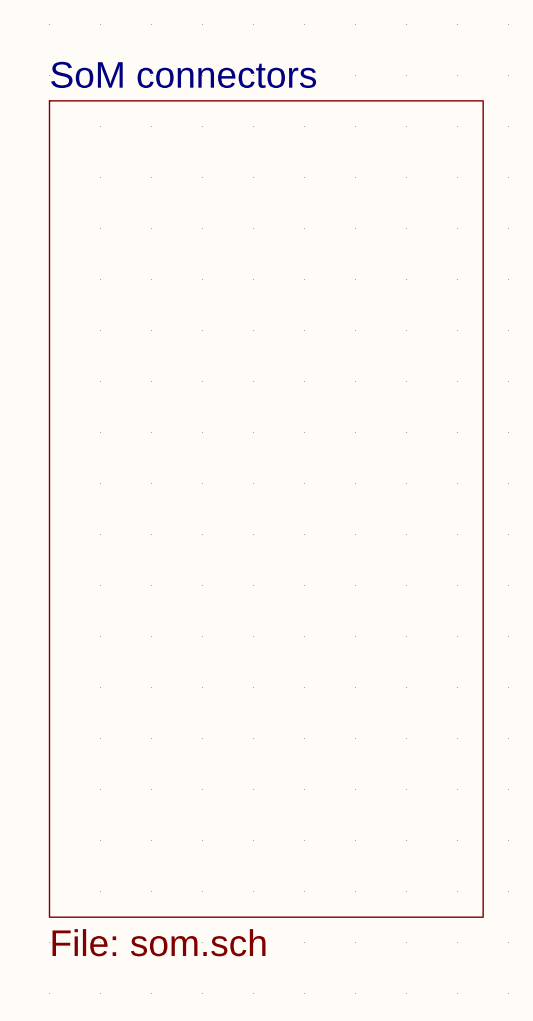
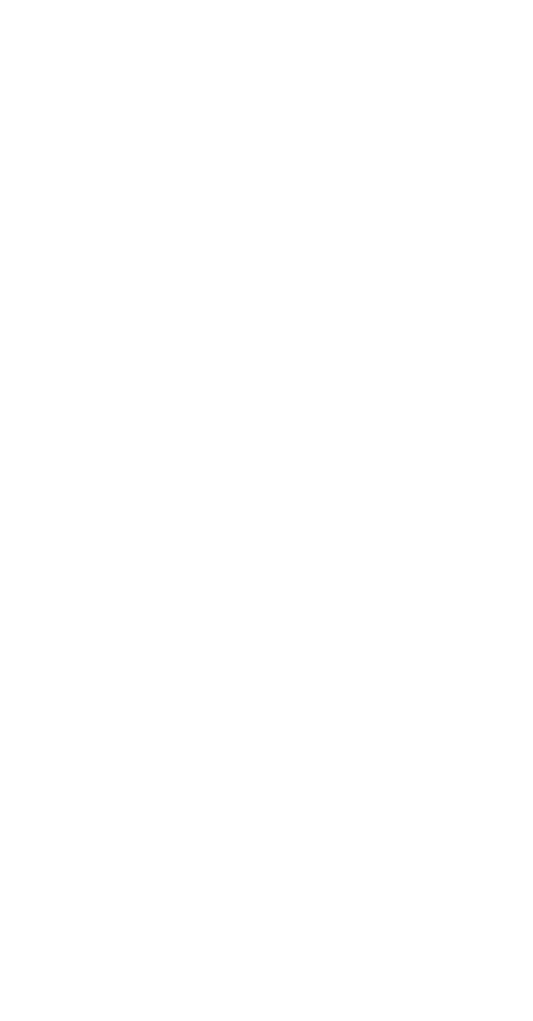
sheet SoM connectors: File: som.sch (266, 509) -> none

